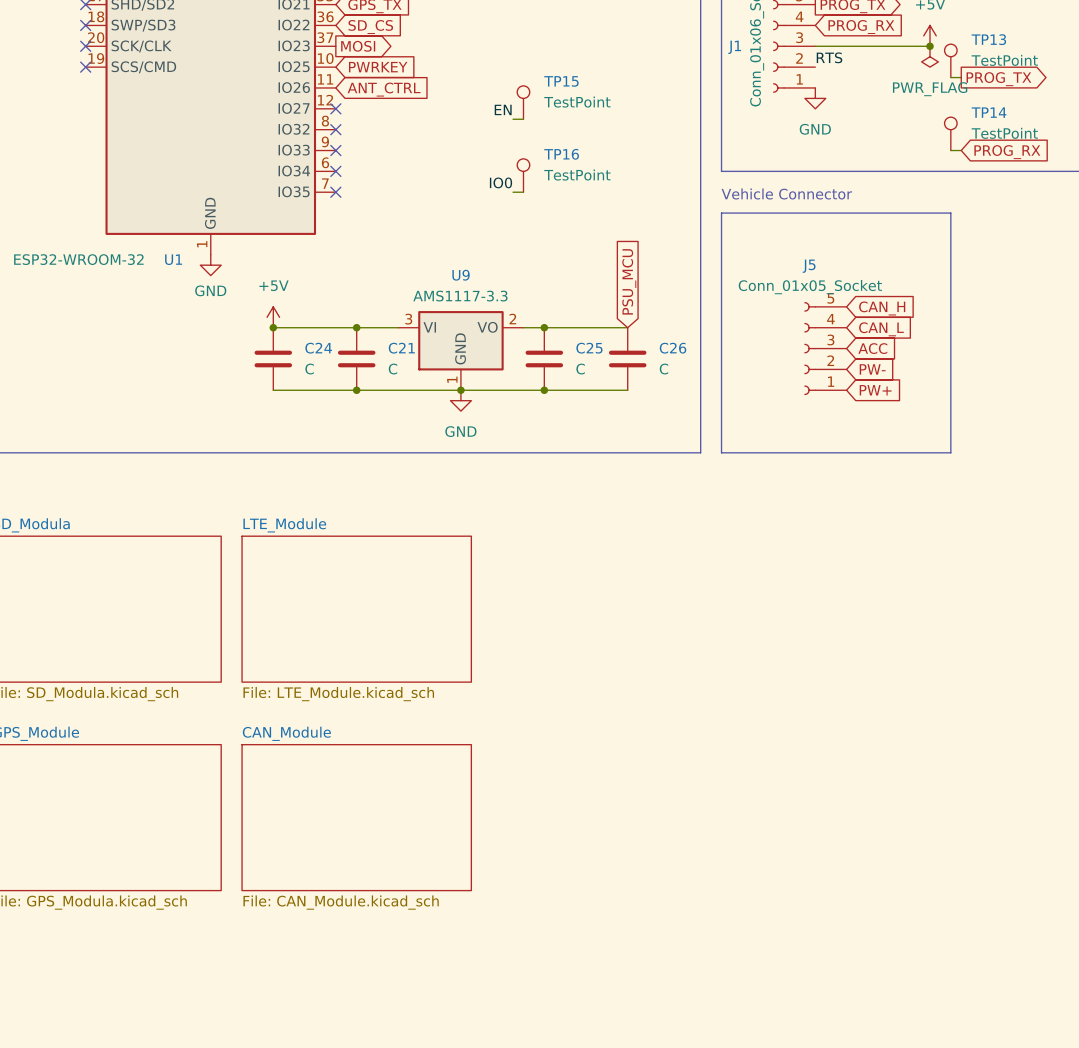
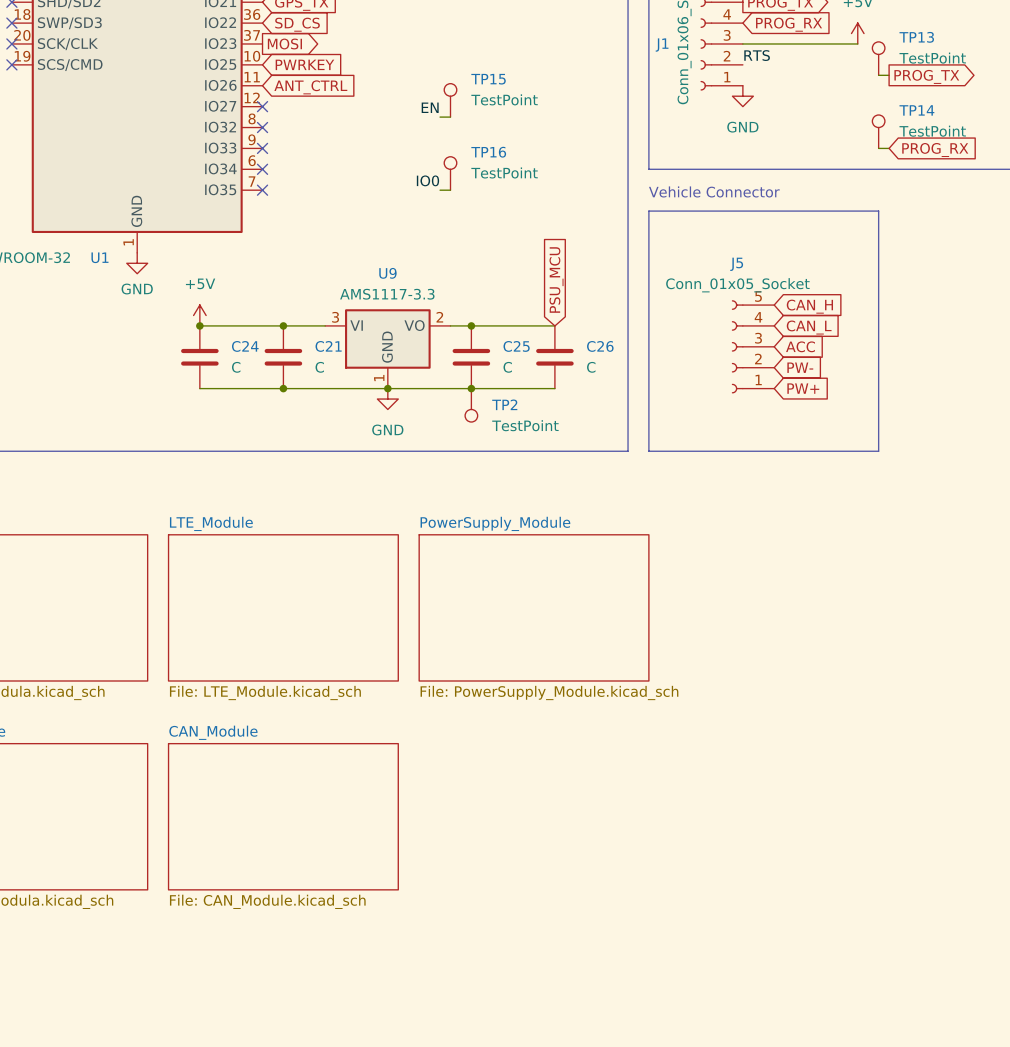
junction: (929, 46) -> none
power symbol: PWR_FLAG (929, 56) -> none
TP2: none -> TestPoint (471, 405)
sheet PowerSupply_Module: none -> File: PowerSupply_Module.kicad_sch (534, 607)

